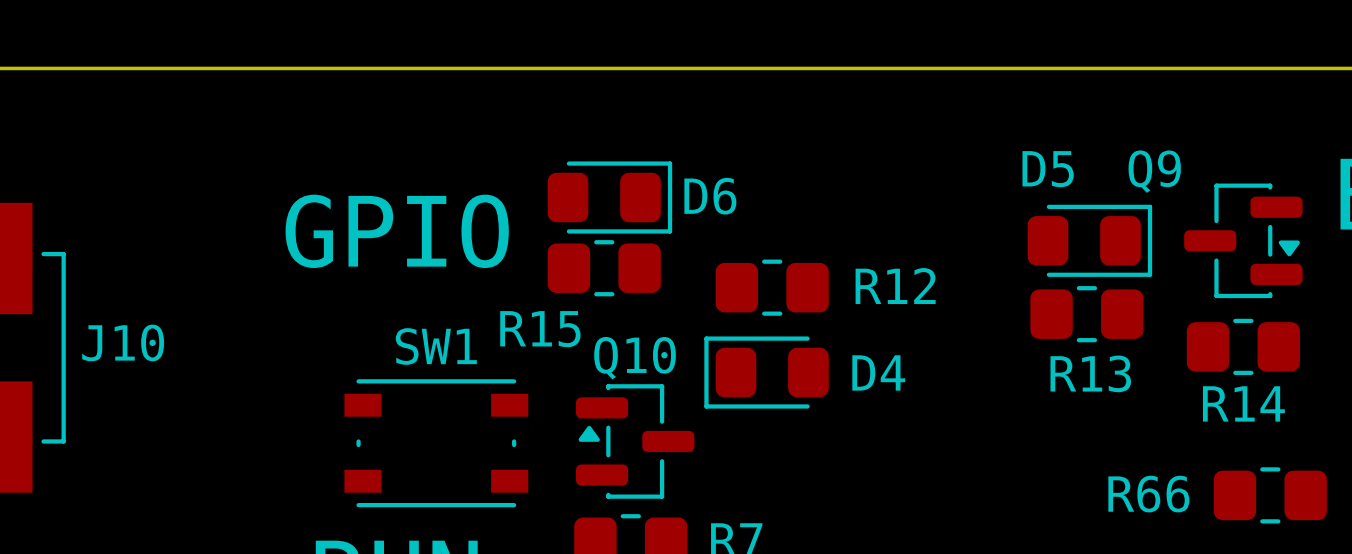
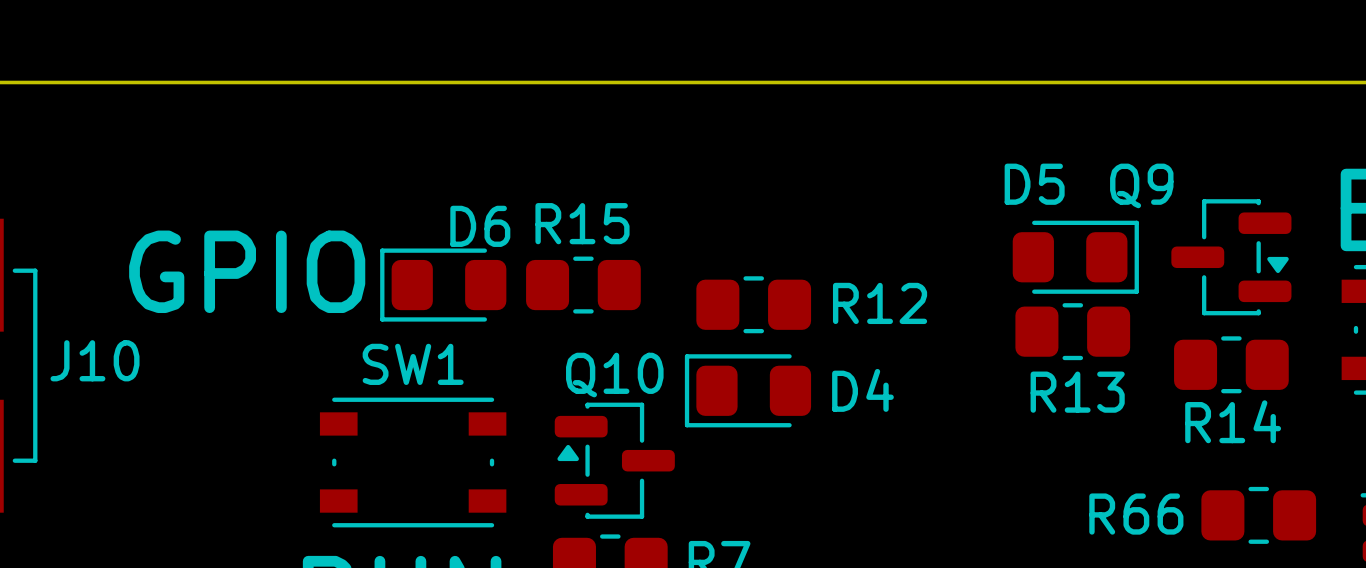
D6 name position: D6 (710, 196) -> D6 (480, 226)
D6 rotation: 0° (609, 197) -> 180° (443, 285)
D6 position: (609, 197) -> (443, 285)
text position: GPIO (397, 231) -> GPIO (247, 271)
R15 name position: R15 (540, 329) -> R15 (582, 223)

